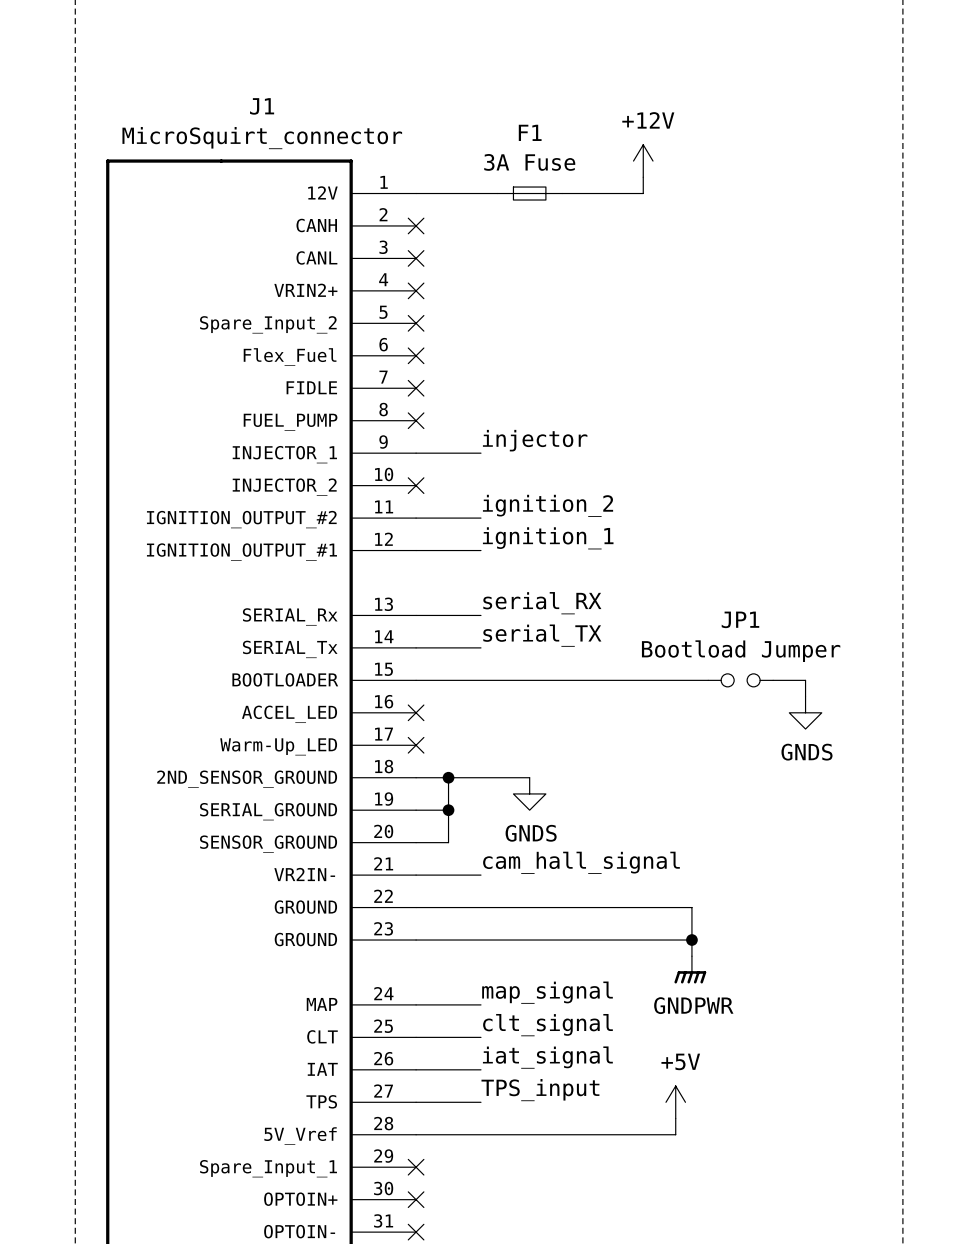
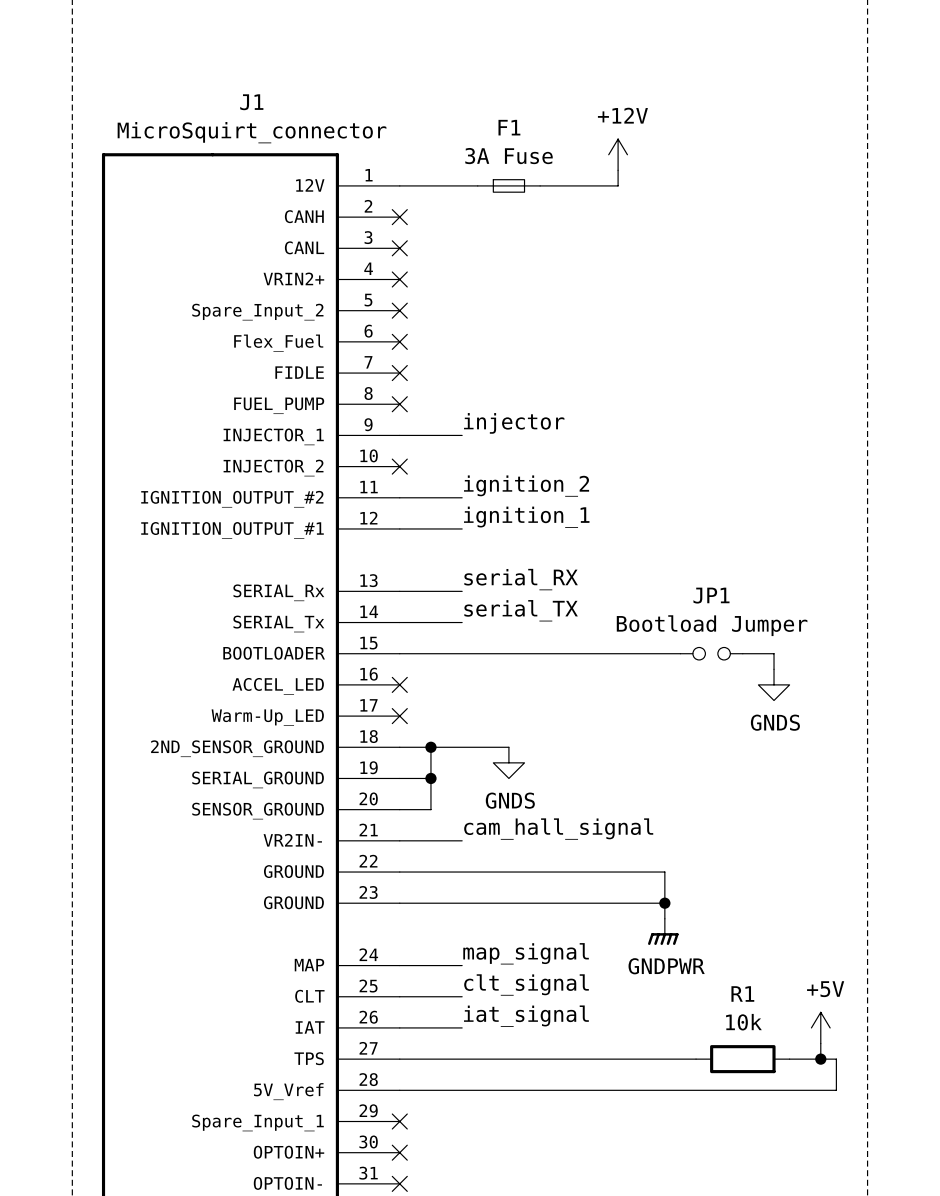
wire: none -> (820, 1043) (820, 1059)
label: TPS_input (540, 1090) -> none
wire: none -> (462, 1059) (696, 1059)
power symbol position: +5V (675, 1102) -> +5V (820, 1027)
R1: none -> 10k (742, 1059)
junction: none -> (820, 1059)
wire: (675, 1118) (675, 1134) -> (789, 1059) (836, 1059) (836, 1090) (649, 1090)

